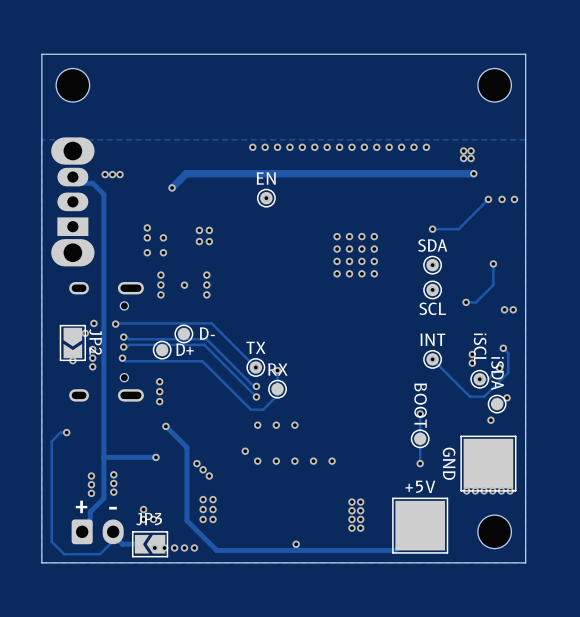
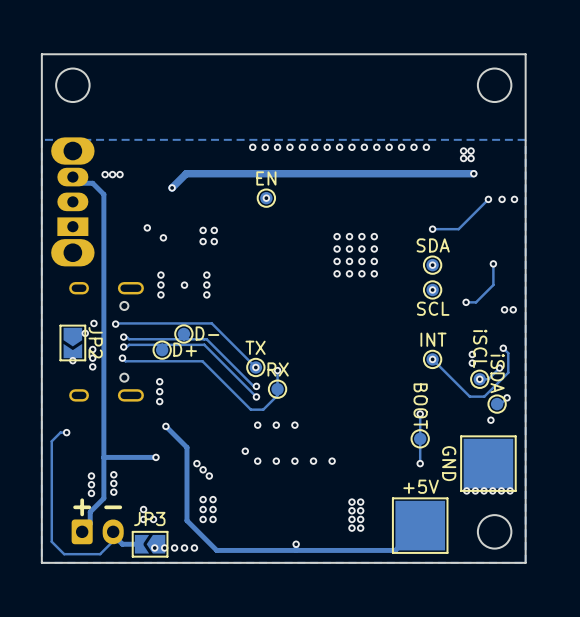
via: (199, 230) -> none
via: none -> (203, 230)
via: (209, 230) -> none
via: none -> (214, 230)
via: (147, 237) -> none
via: (199, 241) -> none
via: none -> (203, 241)
via: (209, 241) -> none
via: none -> (214, 241)
via: (147, 252) -> none
via: (163, 252) -> none

